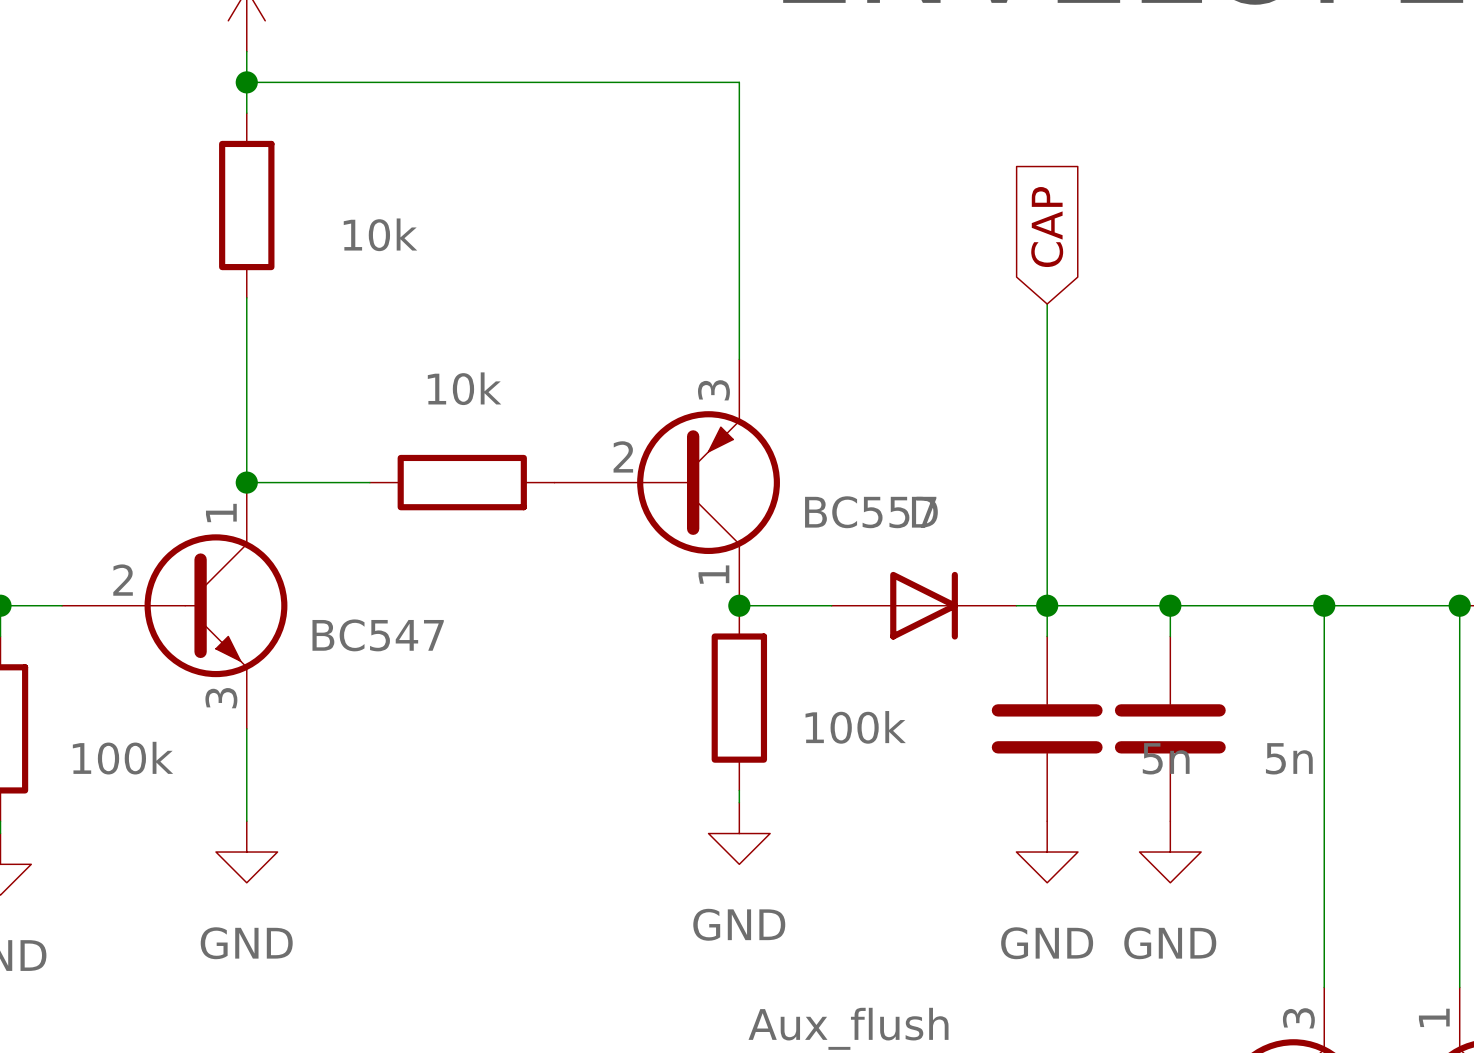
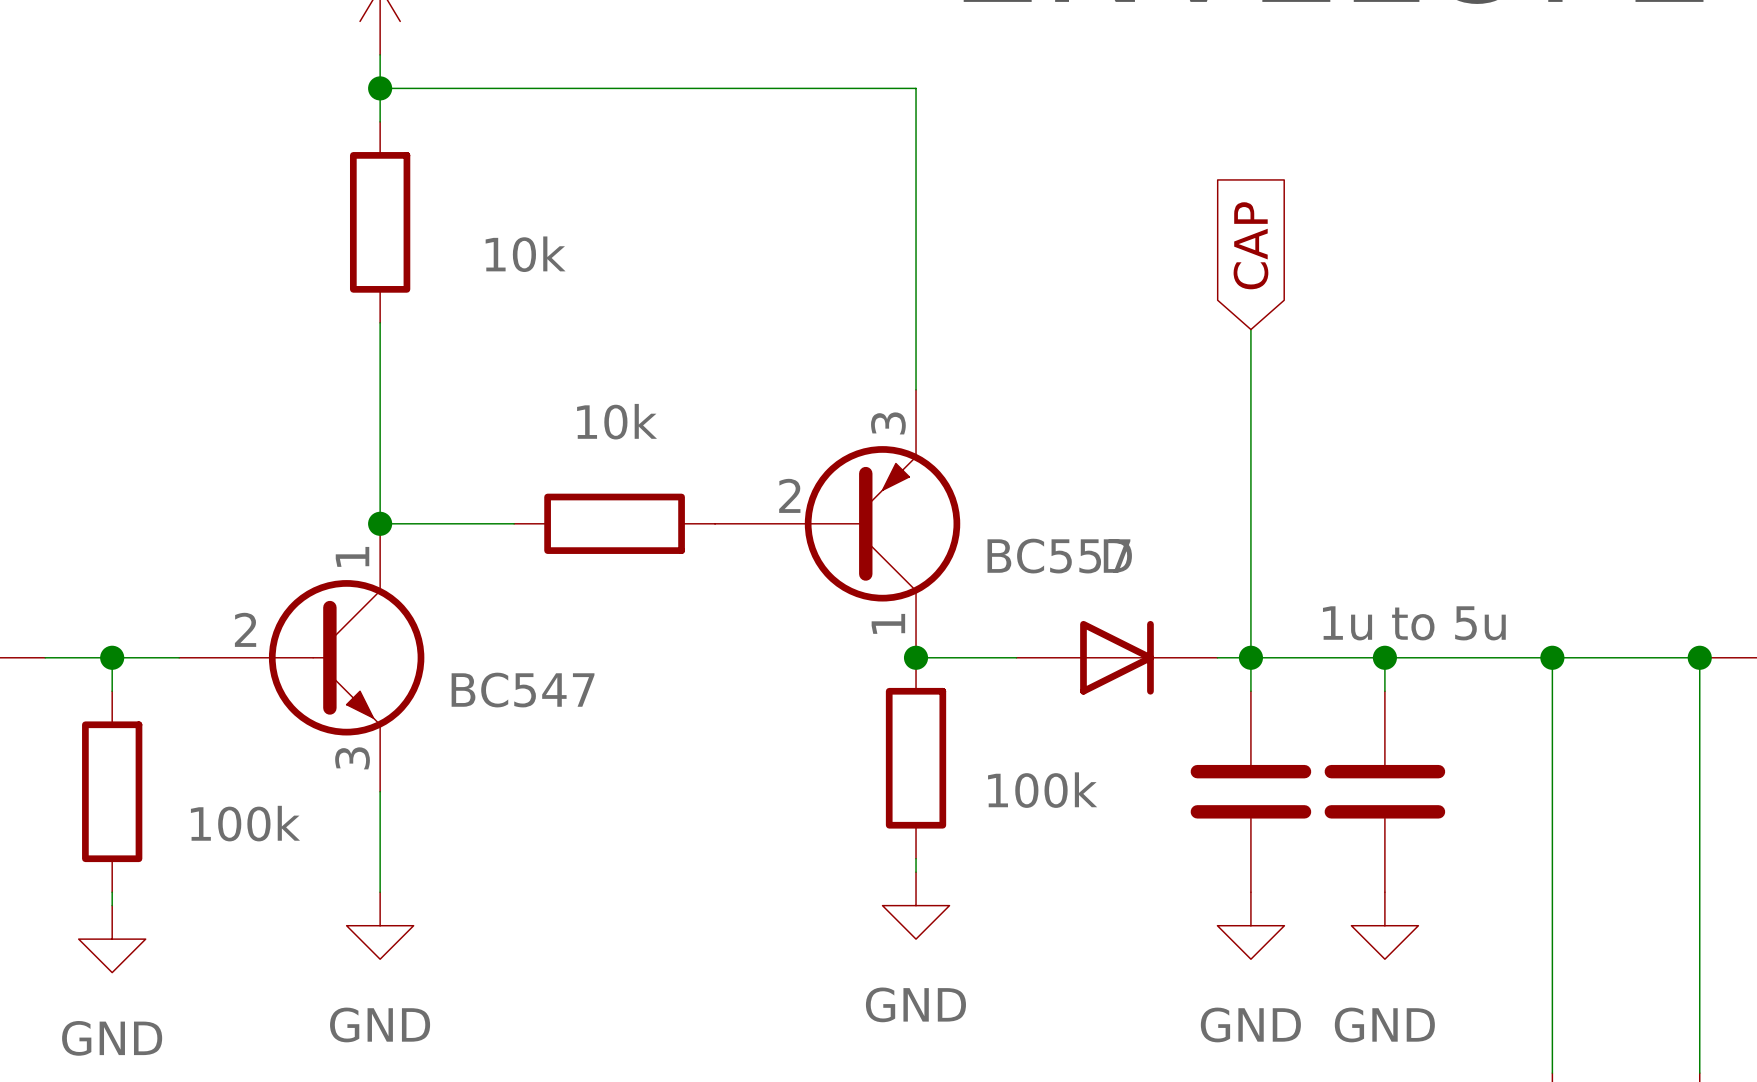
part value: 5n (1166, 758) -> none
part value: 5n (1289, 758) -> 1u to 5u (1414, 623)

